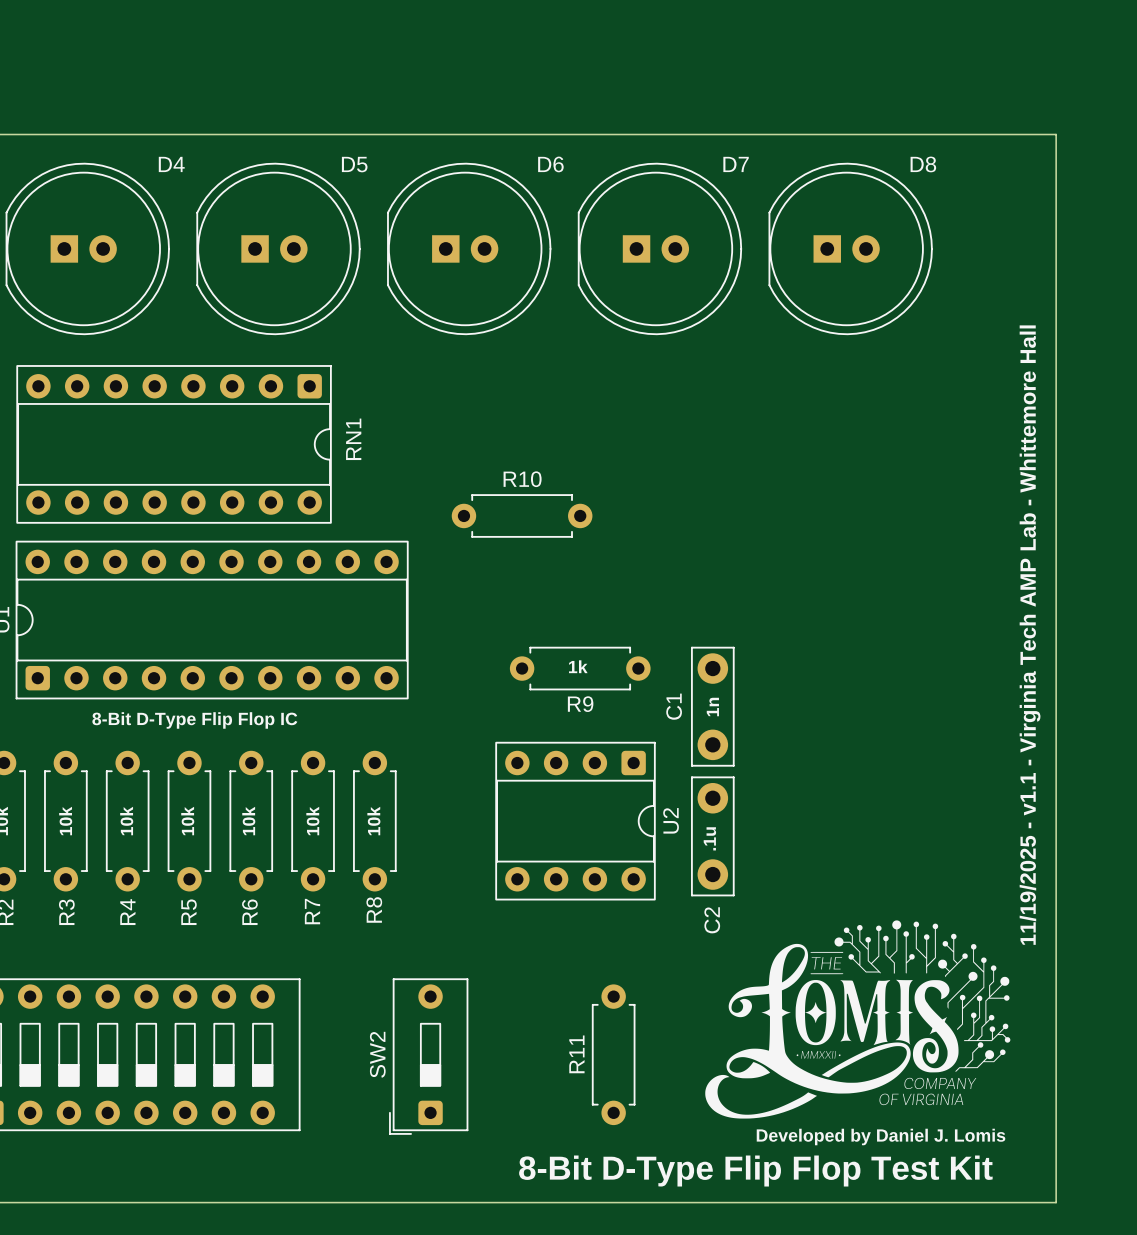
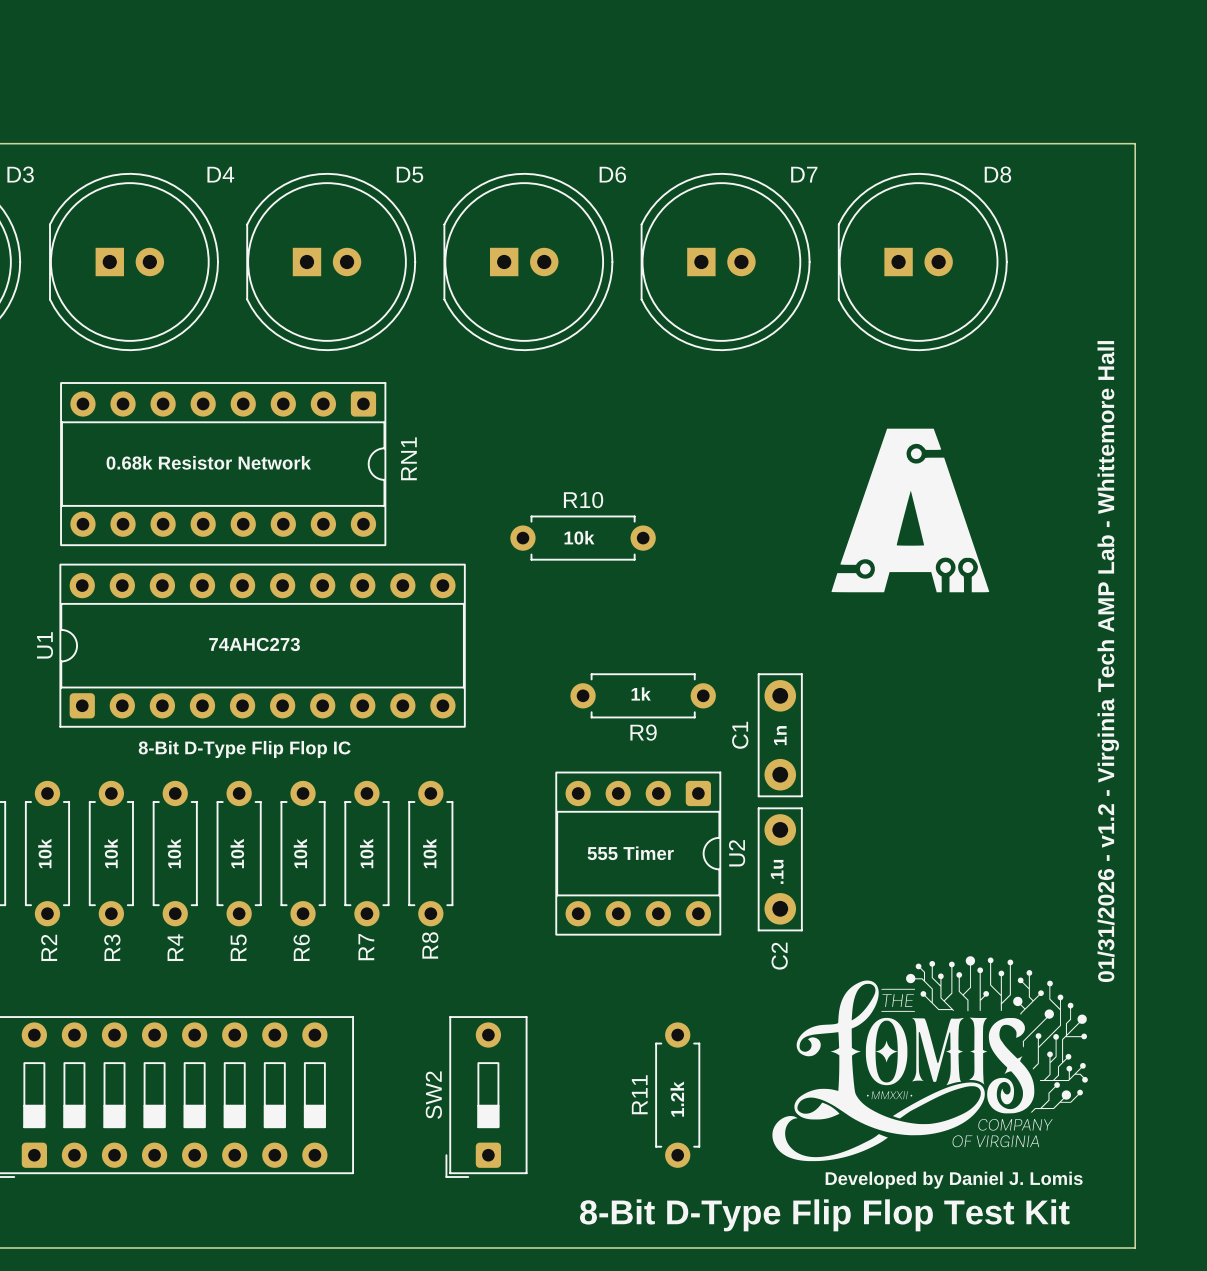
drawing: none -> [831, 428, 990, 593]
text: none -> 0.68k Resistor Network (208, 462)
text: none -> 10k (579, 537)
text: none -> 74AHC273 (254, 644)
text: 11/19/2025 - v1.1 - Virginia Tech AMP Lab - Whittemore Hall (1030, 635) -> 01/31/2026 - v1.2 - Virginia Tech AMP Lab - Whittemore Hall (1108, 661)
text: none -> 555 Timer (630, 853)
text: none -> 1.2k (677, 1099)

